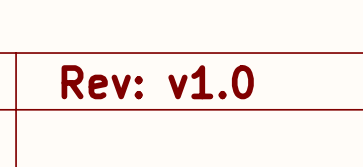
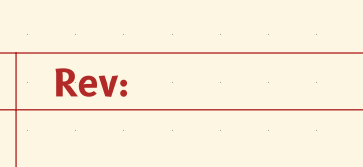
title block: Rev: v1.0 (157, 82) -> Rev: (91, 82)

